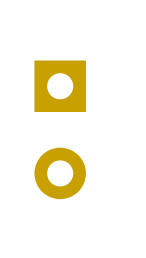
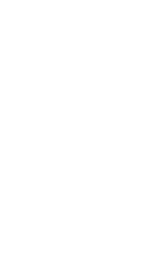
part: (60, 129) -> none

